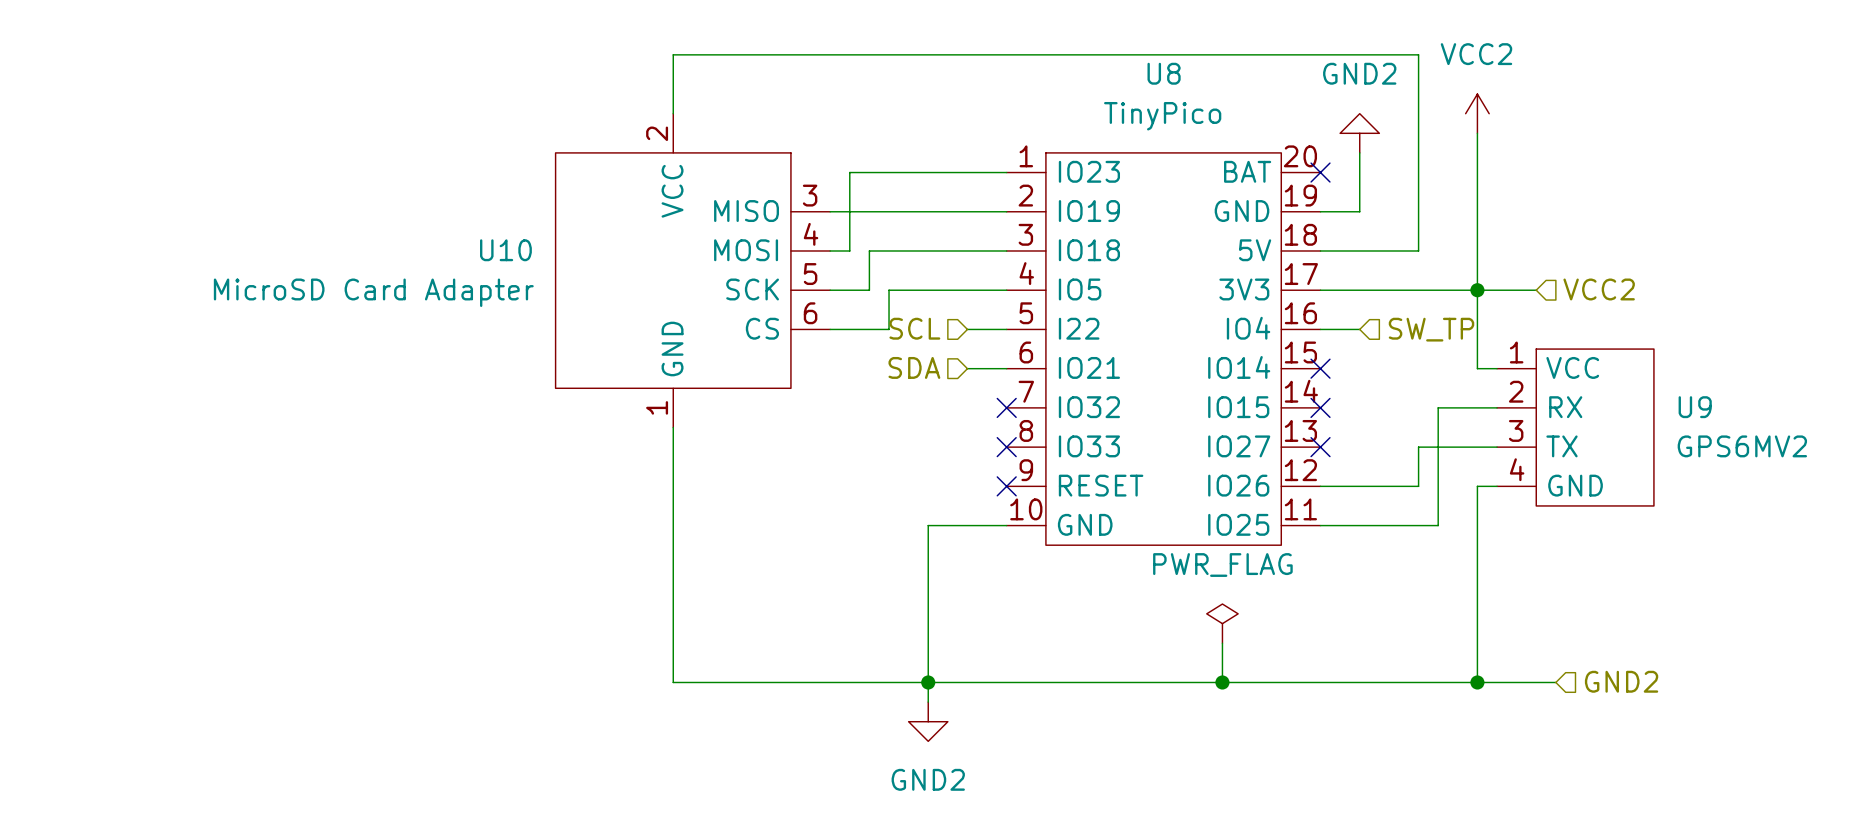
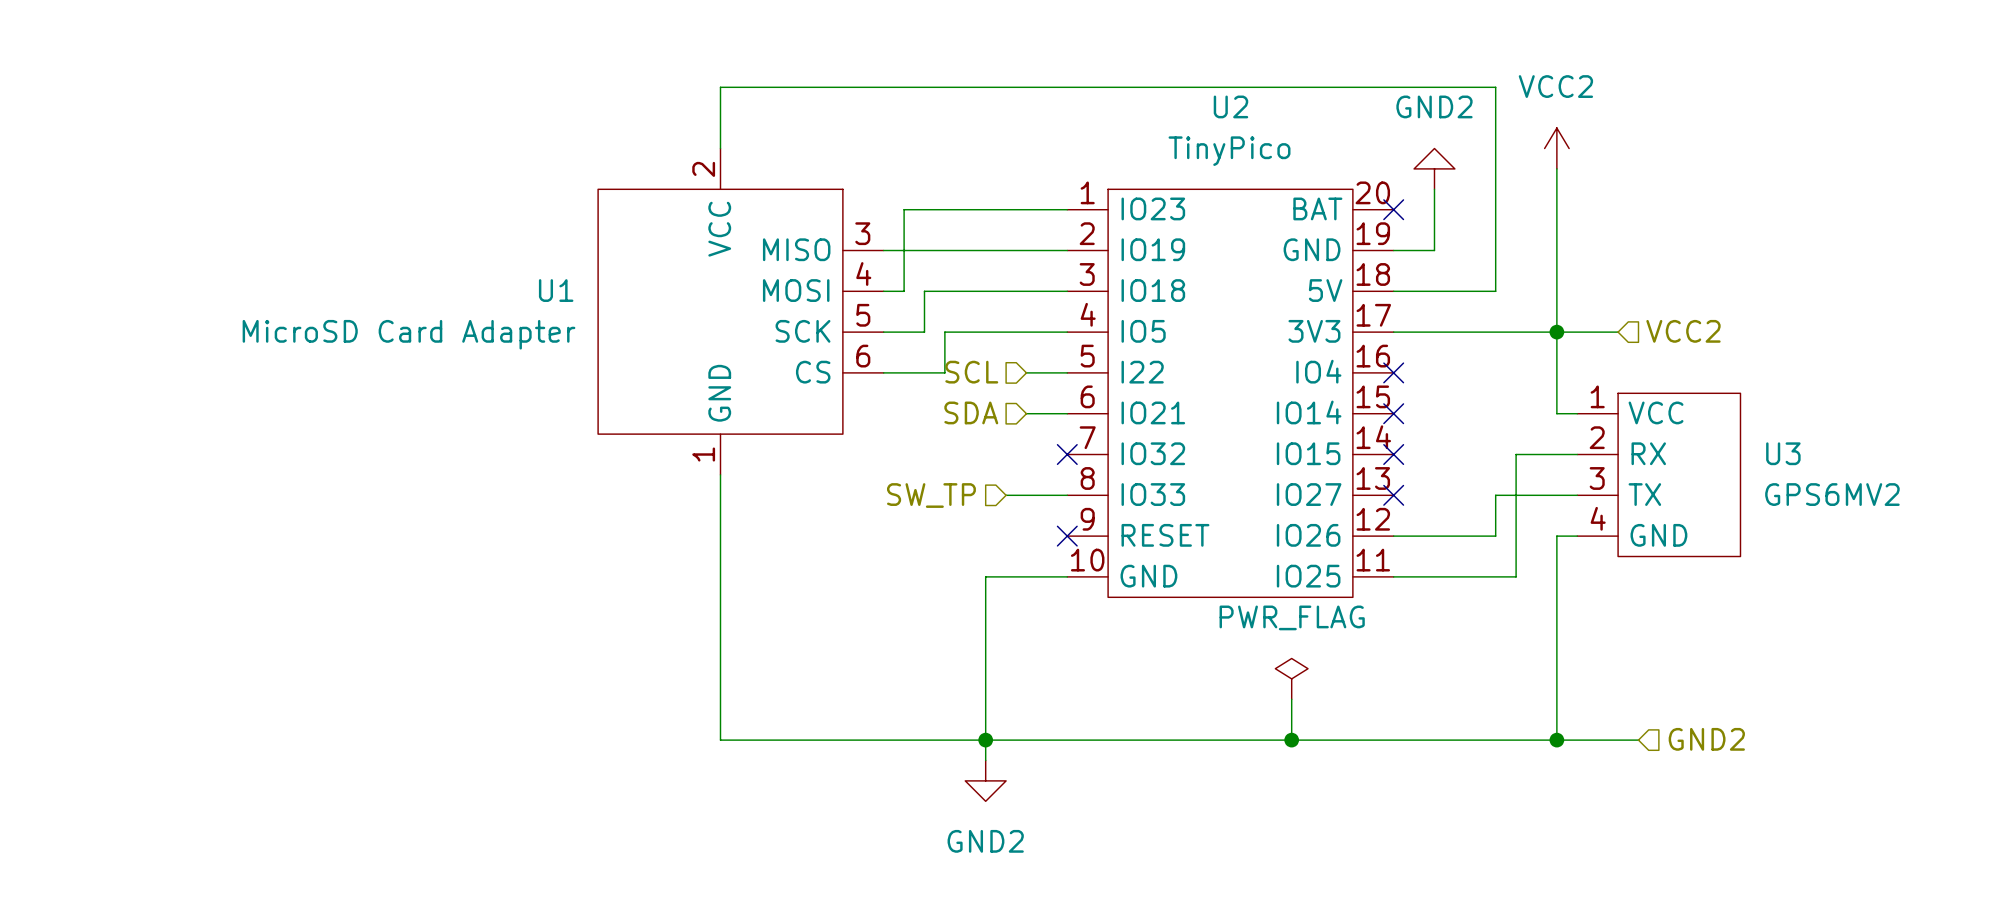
U8 name: U8 (1164, 73) -> U2 (1230, 106)
U10 name: U10 (505, 250) -> U1 (556, 290)
wire: (1320, 329) (1359, 329) -> none
no-connect mark: none -> (1393, 372)
hierarchical label: SW_TP (1431, 329) -> none
U9 name: U9 (1695, 407) -> U3 (1783, 453)
hierarchical label: none -> SW_TP (931, 495)
wire: none -> (1006, 495) (1067, 495)
no-connect mark: (1006, 447) -> none

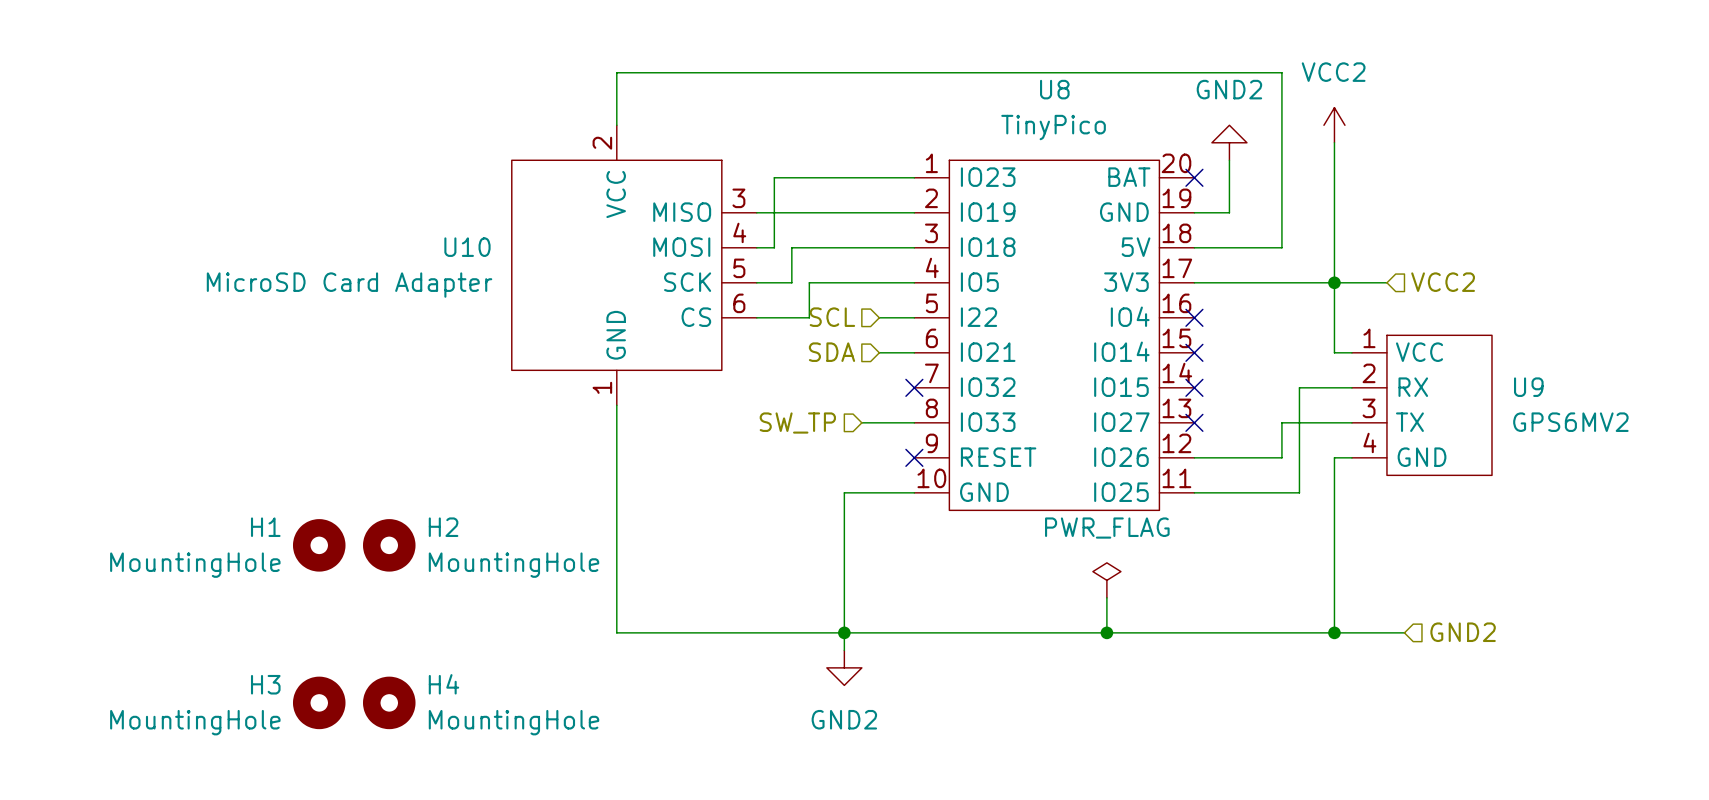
U2 name: U2 (1230, 106) -> U8 (1054, 89)
U1 name: U1 (556, 290) -> U10 (467, 247)
U3 name: U3 (1783, 453) -> U9 (1528, 387)
H1: none -> MountingHole (319, 545)
H2: none -> MountingHole (389, 545)
H3: none -> MountingHole (319, 702)
H4: none -> MountingHole (389, 702)

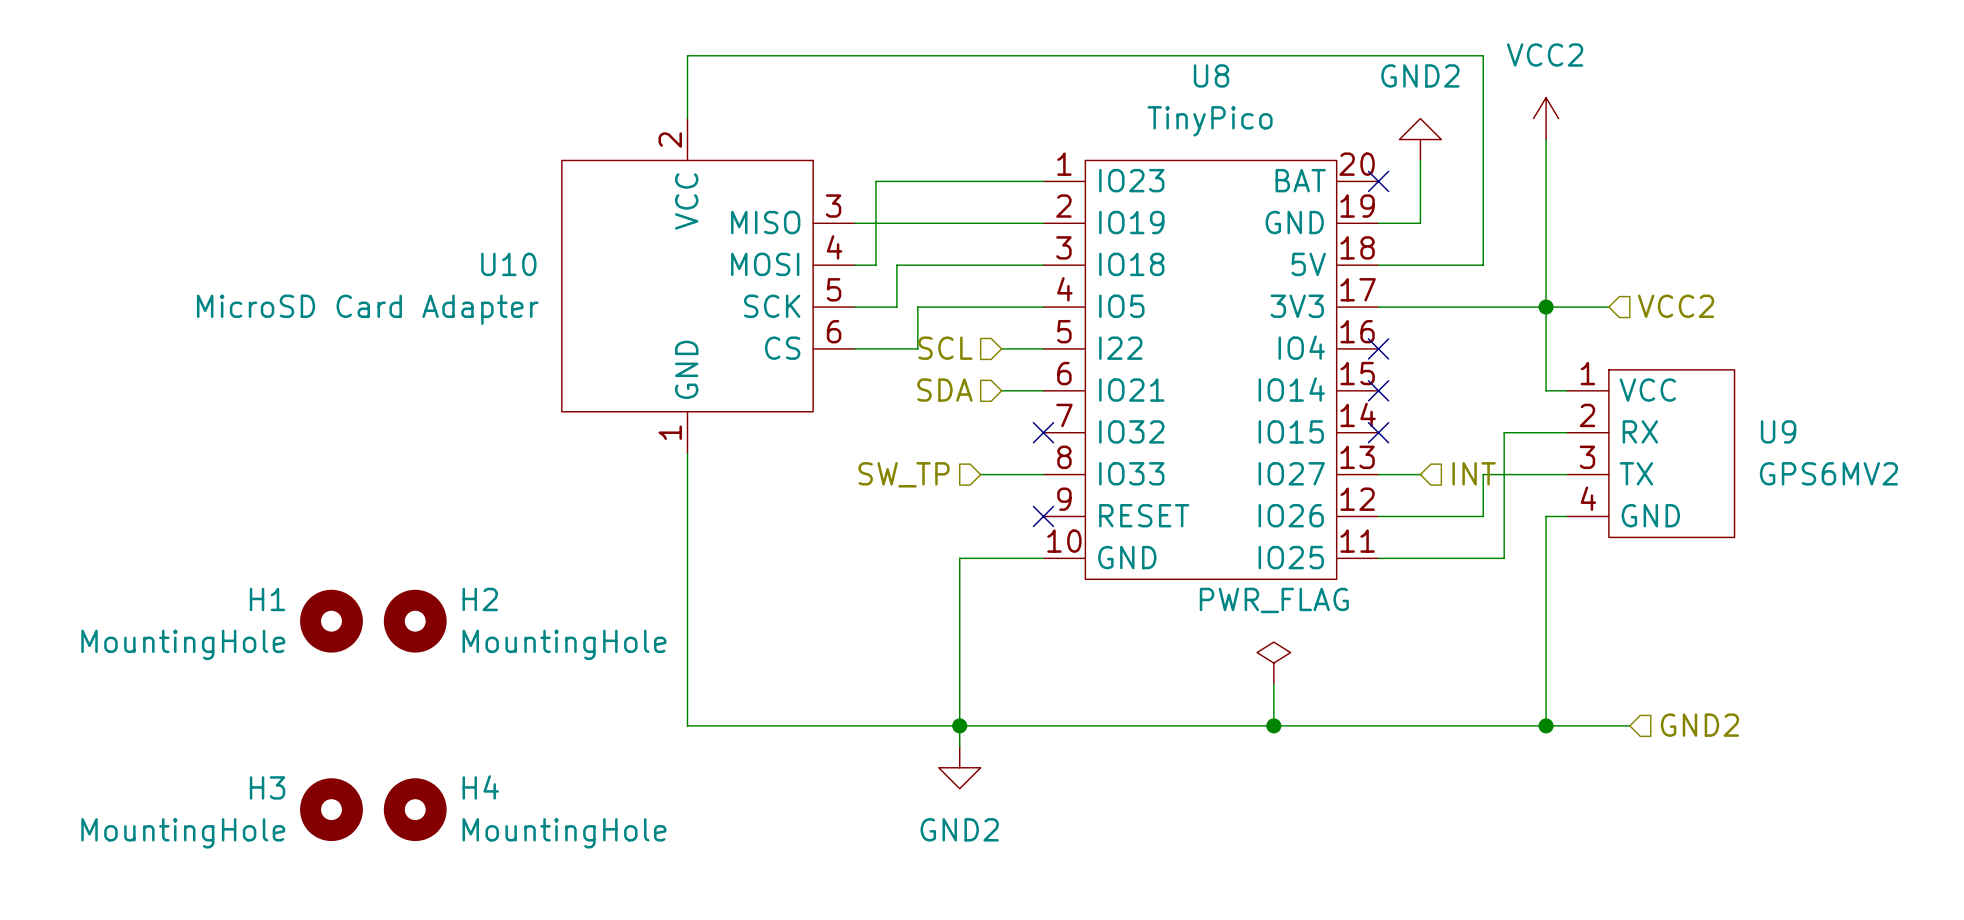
wire: none -> (1378, 474) (1420, 474)
no-connect mark: (1194, 422) -> none
hierarchical label: none -> INT (1474, 473)

